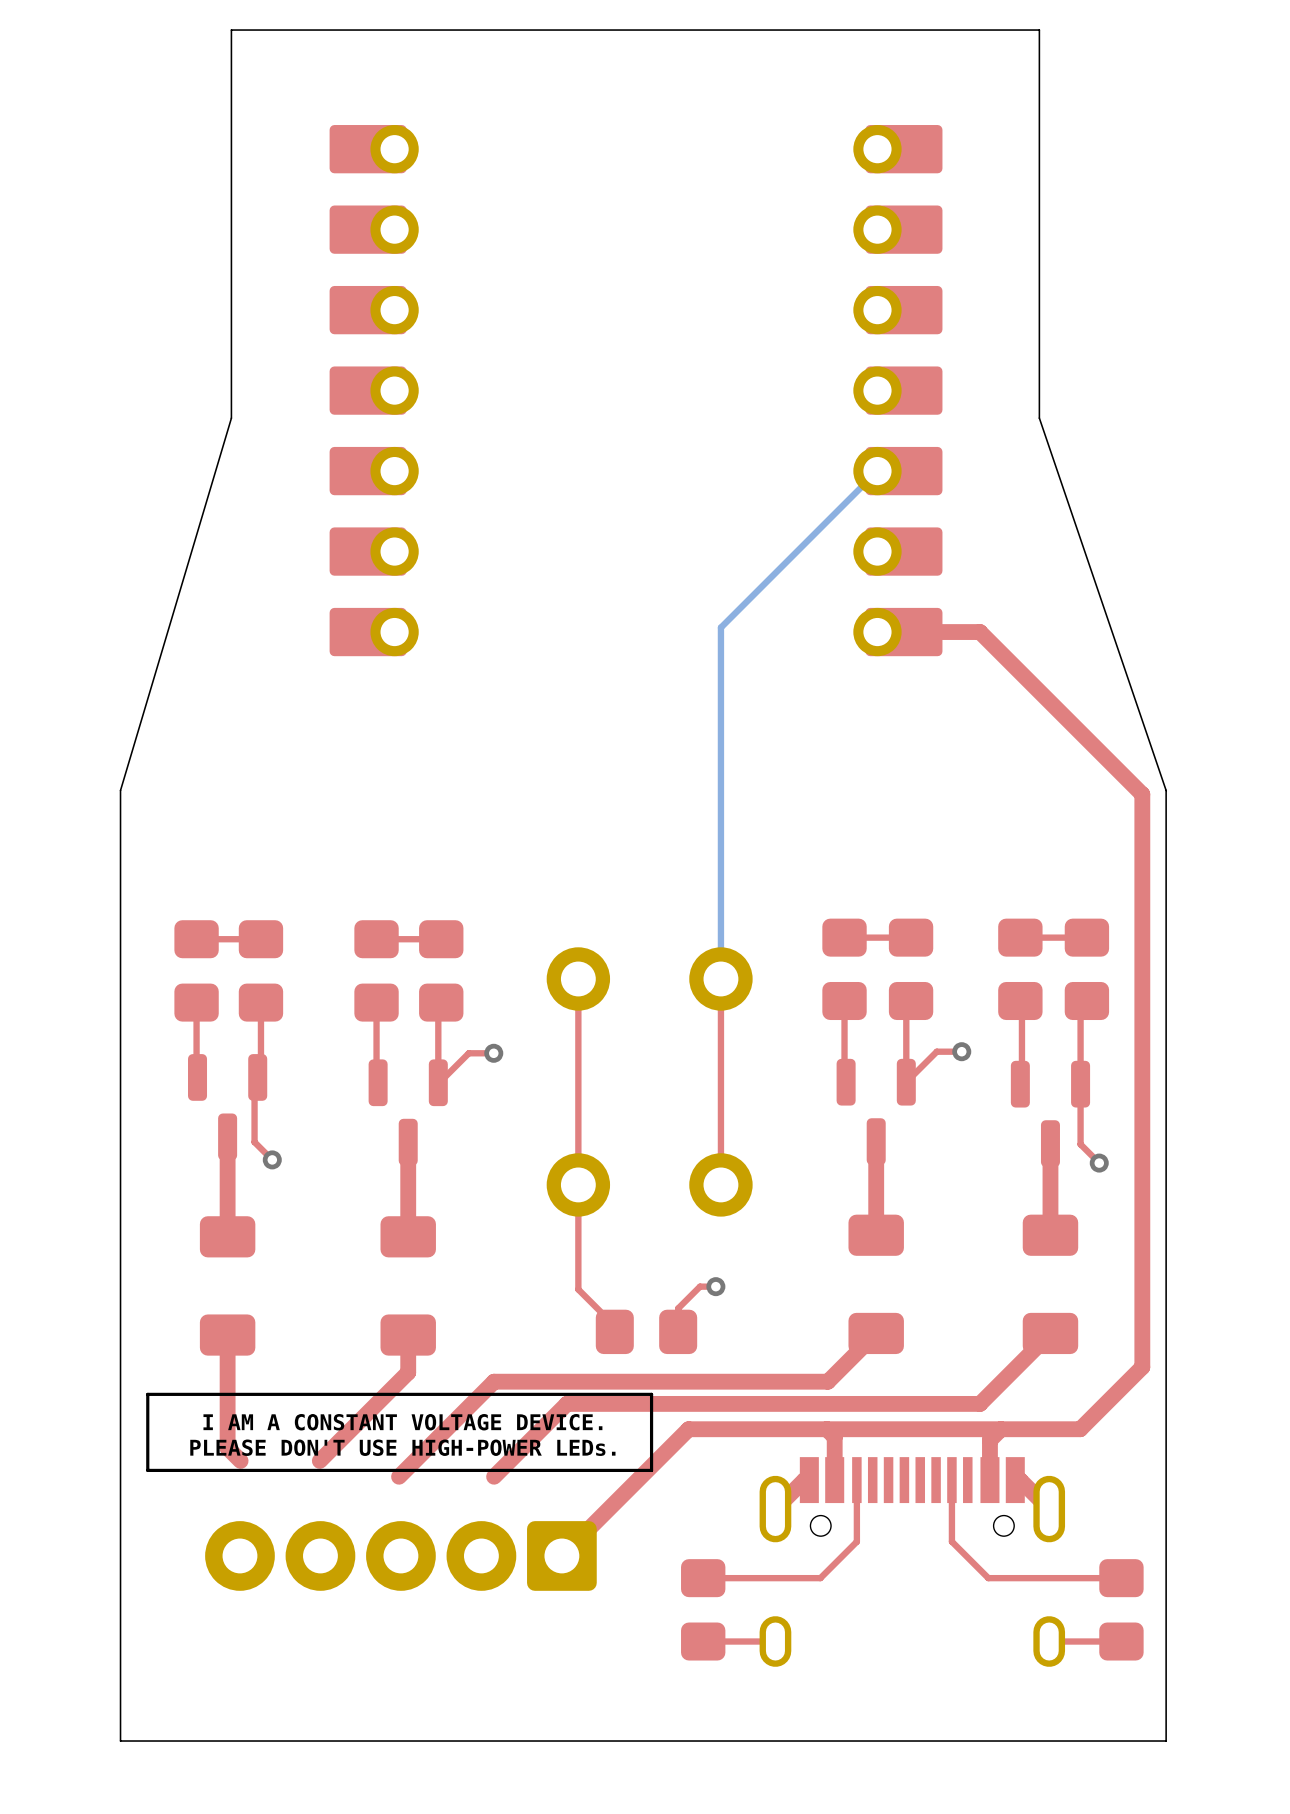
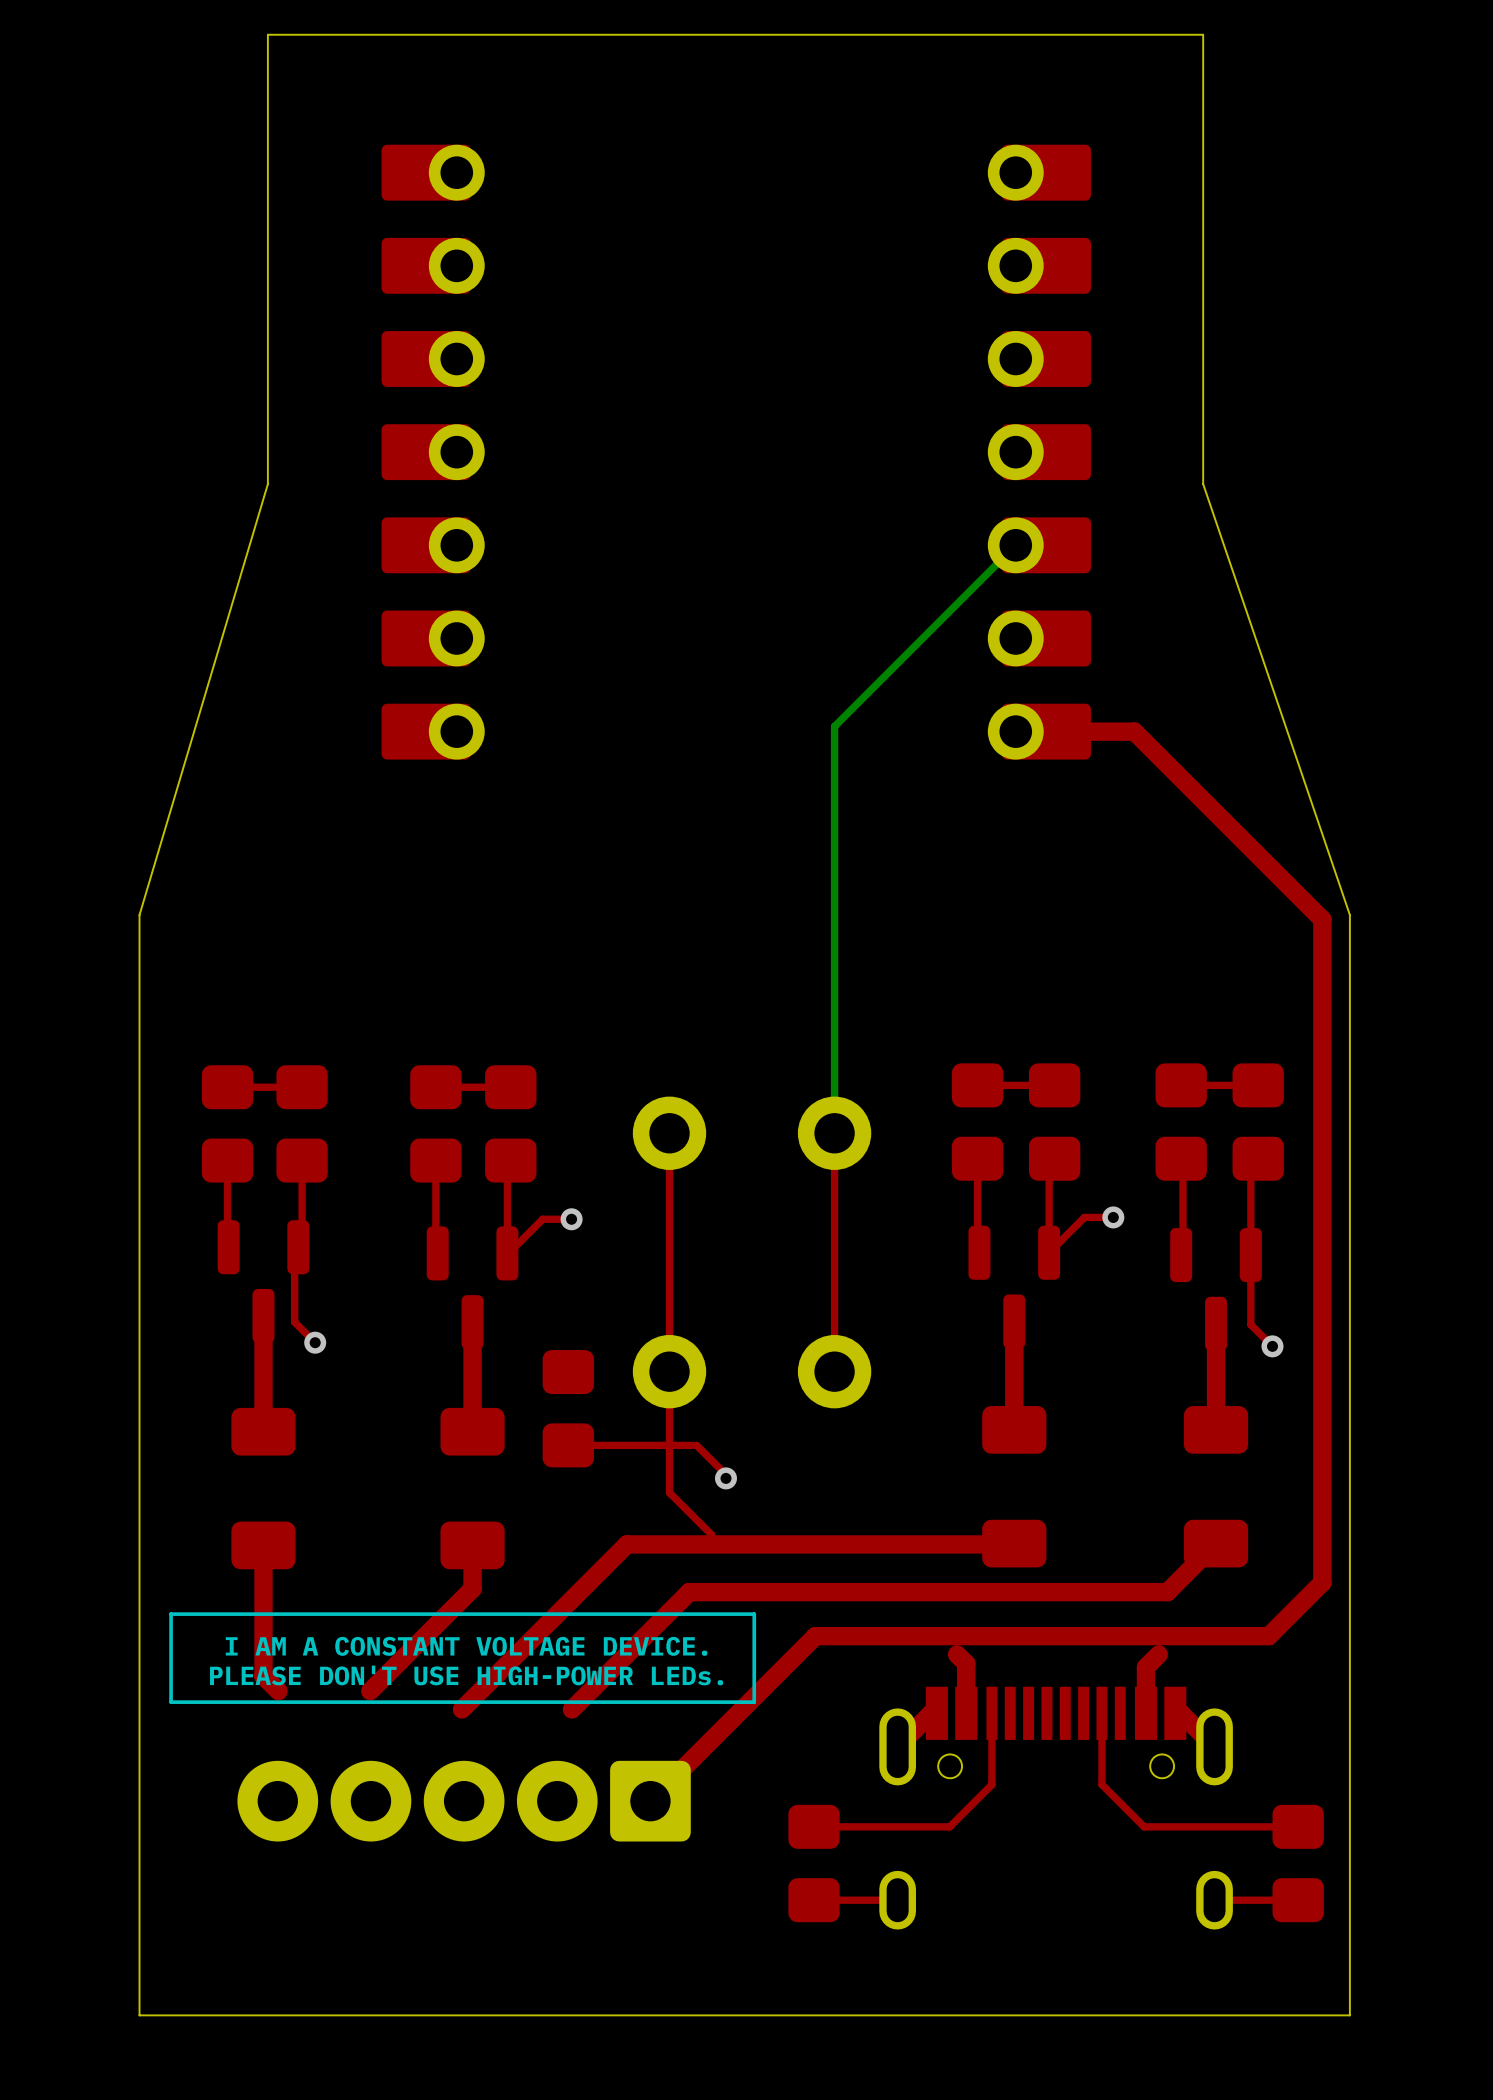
top track: none -> (692, 1445) (568, 1445)
top track: none -> (696, 1445) (726, 1474) (726, 1478)
top track: (715, 1286) (700, 1286) (678, 1308) (678, 1331) -> none
via position: (715, 1286) -> (726, 1478)
part rotation: 0° (646, 1331) -> 90° clockwise (568, 1408)
part position: (646, 1331) -> (568, 1408)
top track: (875, 1334) (827, 1381) (494, 1381) -> (1013, 1544) (626, 1544) (571, 1599)
top track: (1008, 1375) (980, 1403) (566, 1403) -> (1167, 1592) (689, 1592) (656, 1625)
top track: (1096, 1413) (1080, 1429) (688, 1429) -> (1268, 1636) (815, 1636) (797, 1654)

